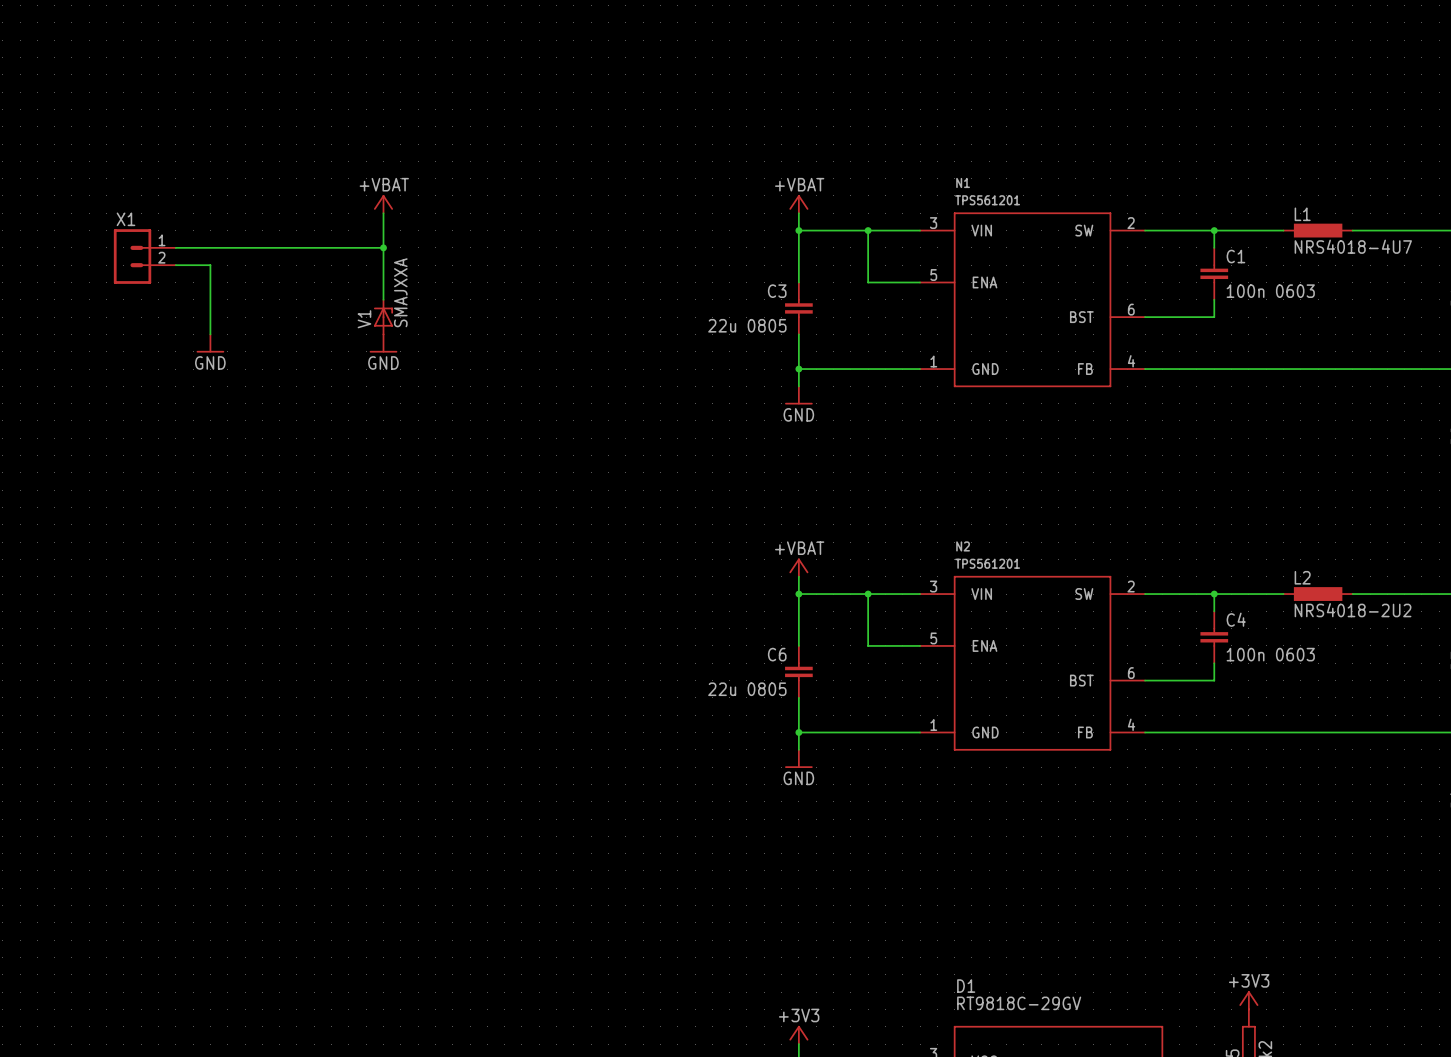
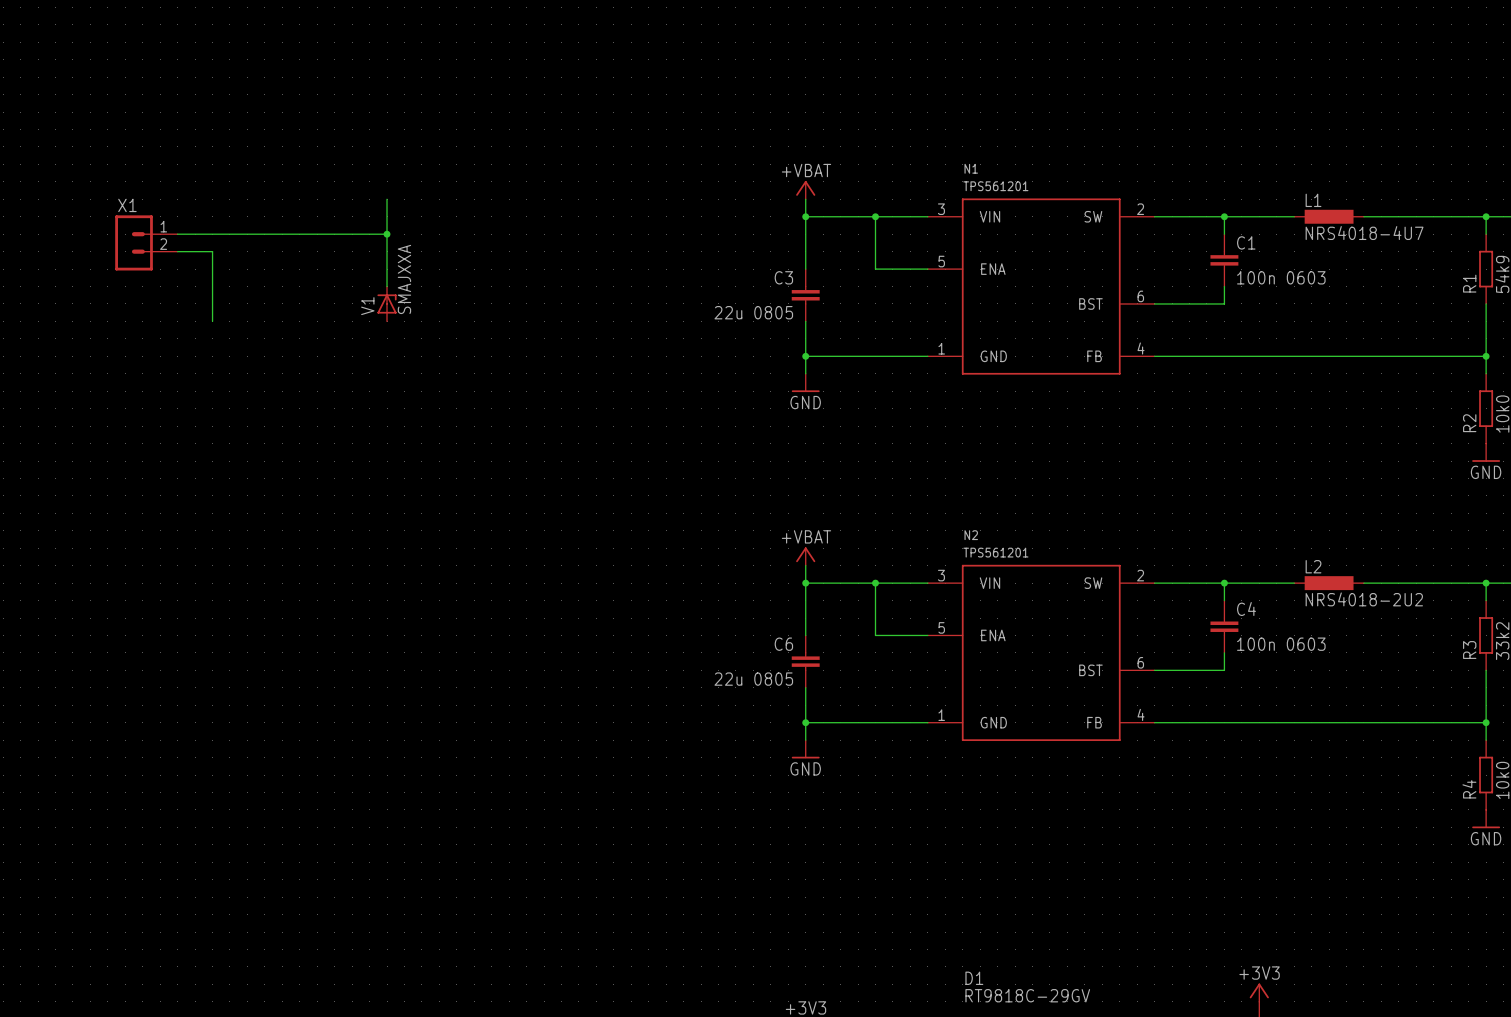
power symbol: +VBAT (383, 204) -> none
power symbol: GND (210, 343) -> none
power symbol: GND (383, 343) -> none

